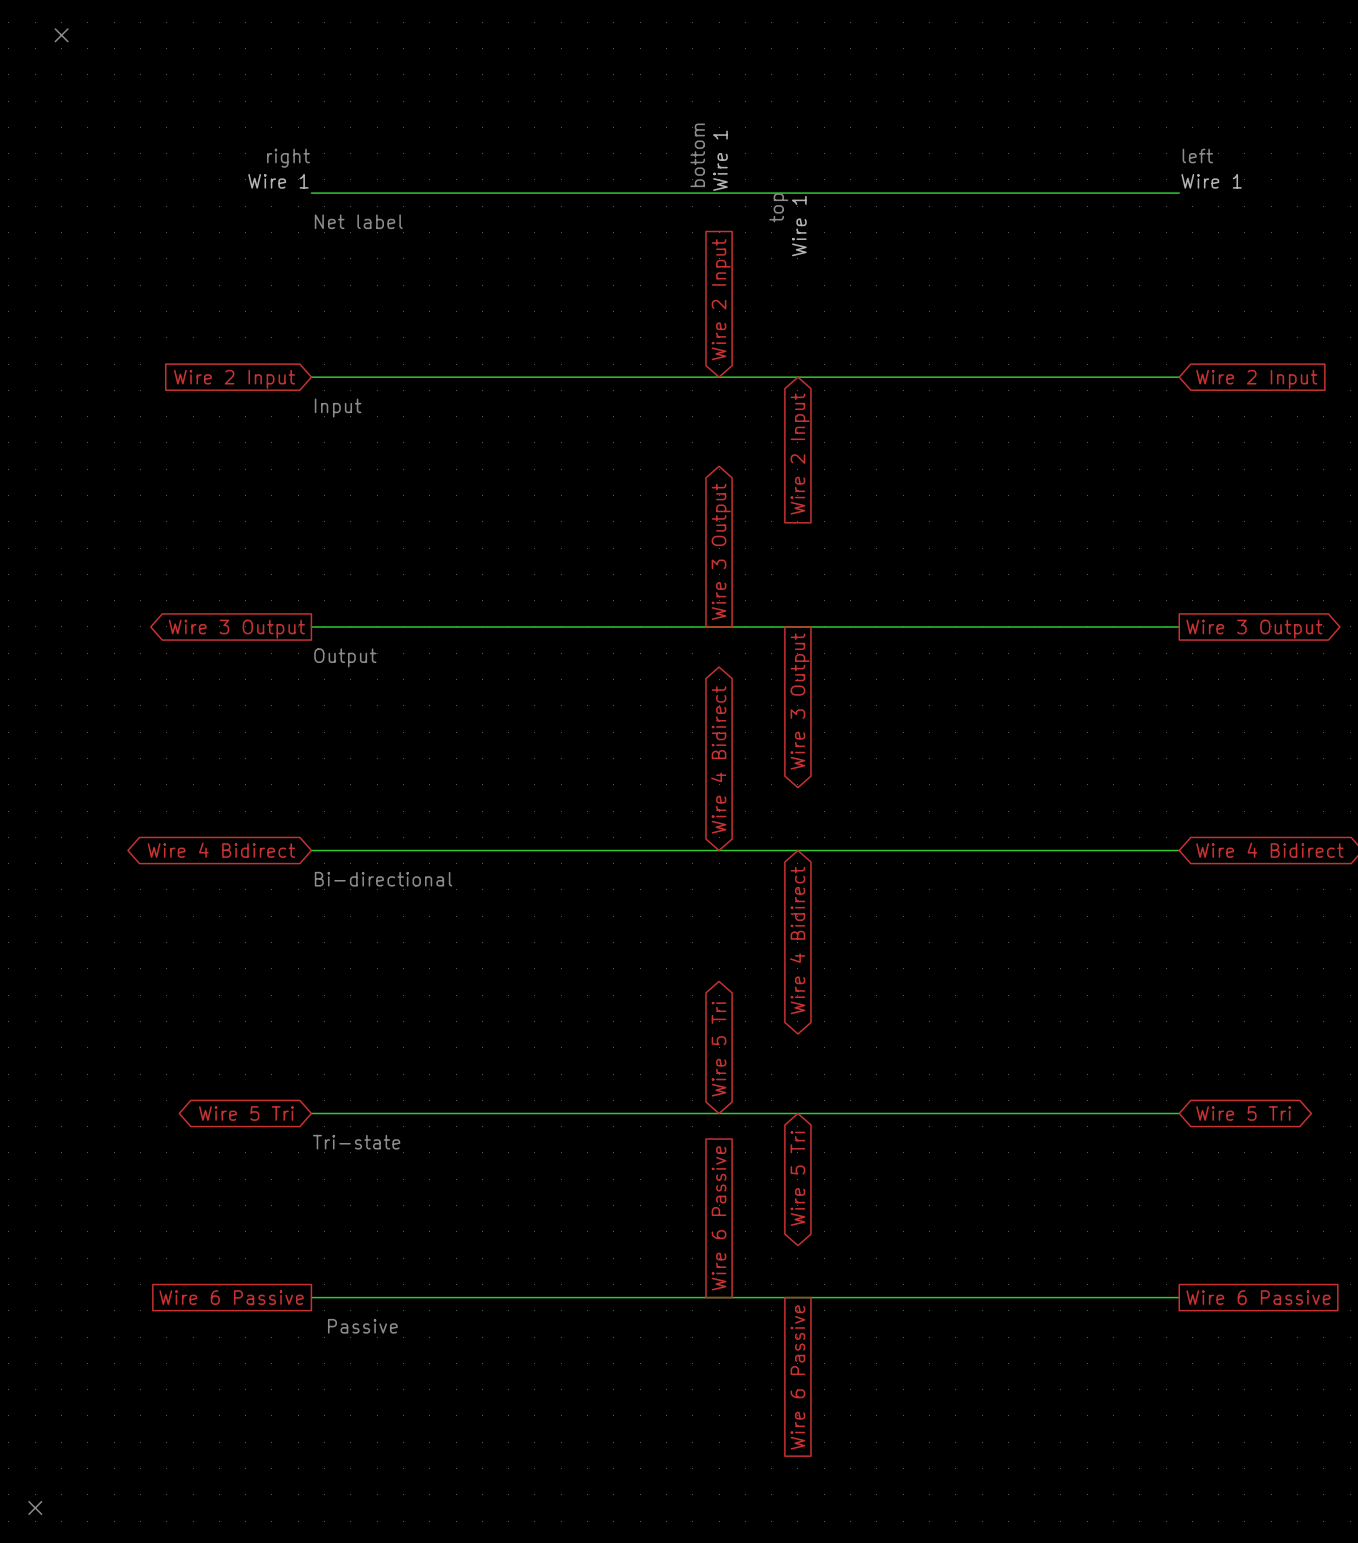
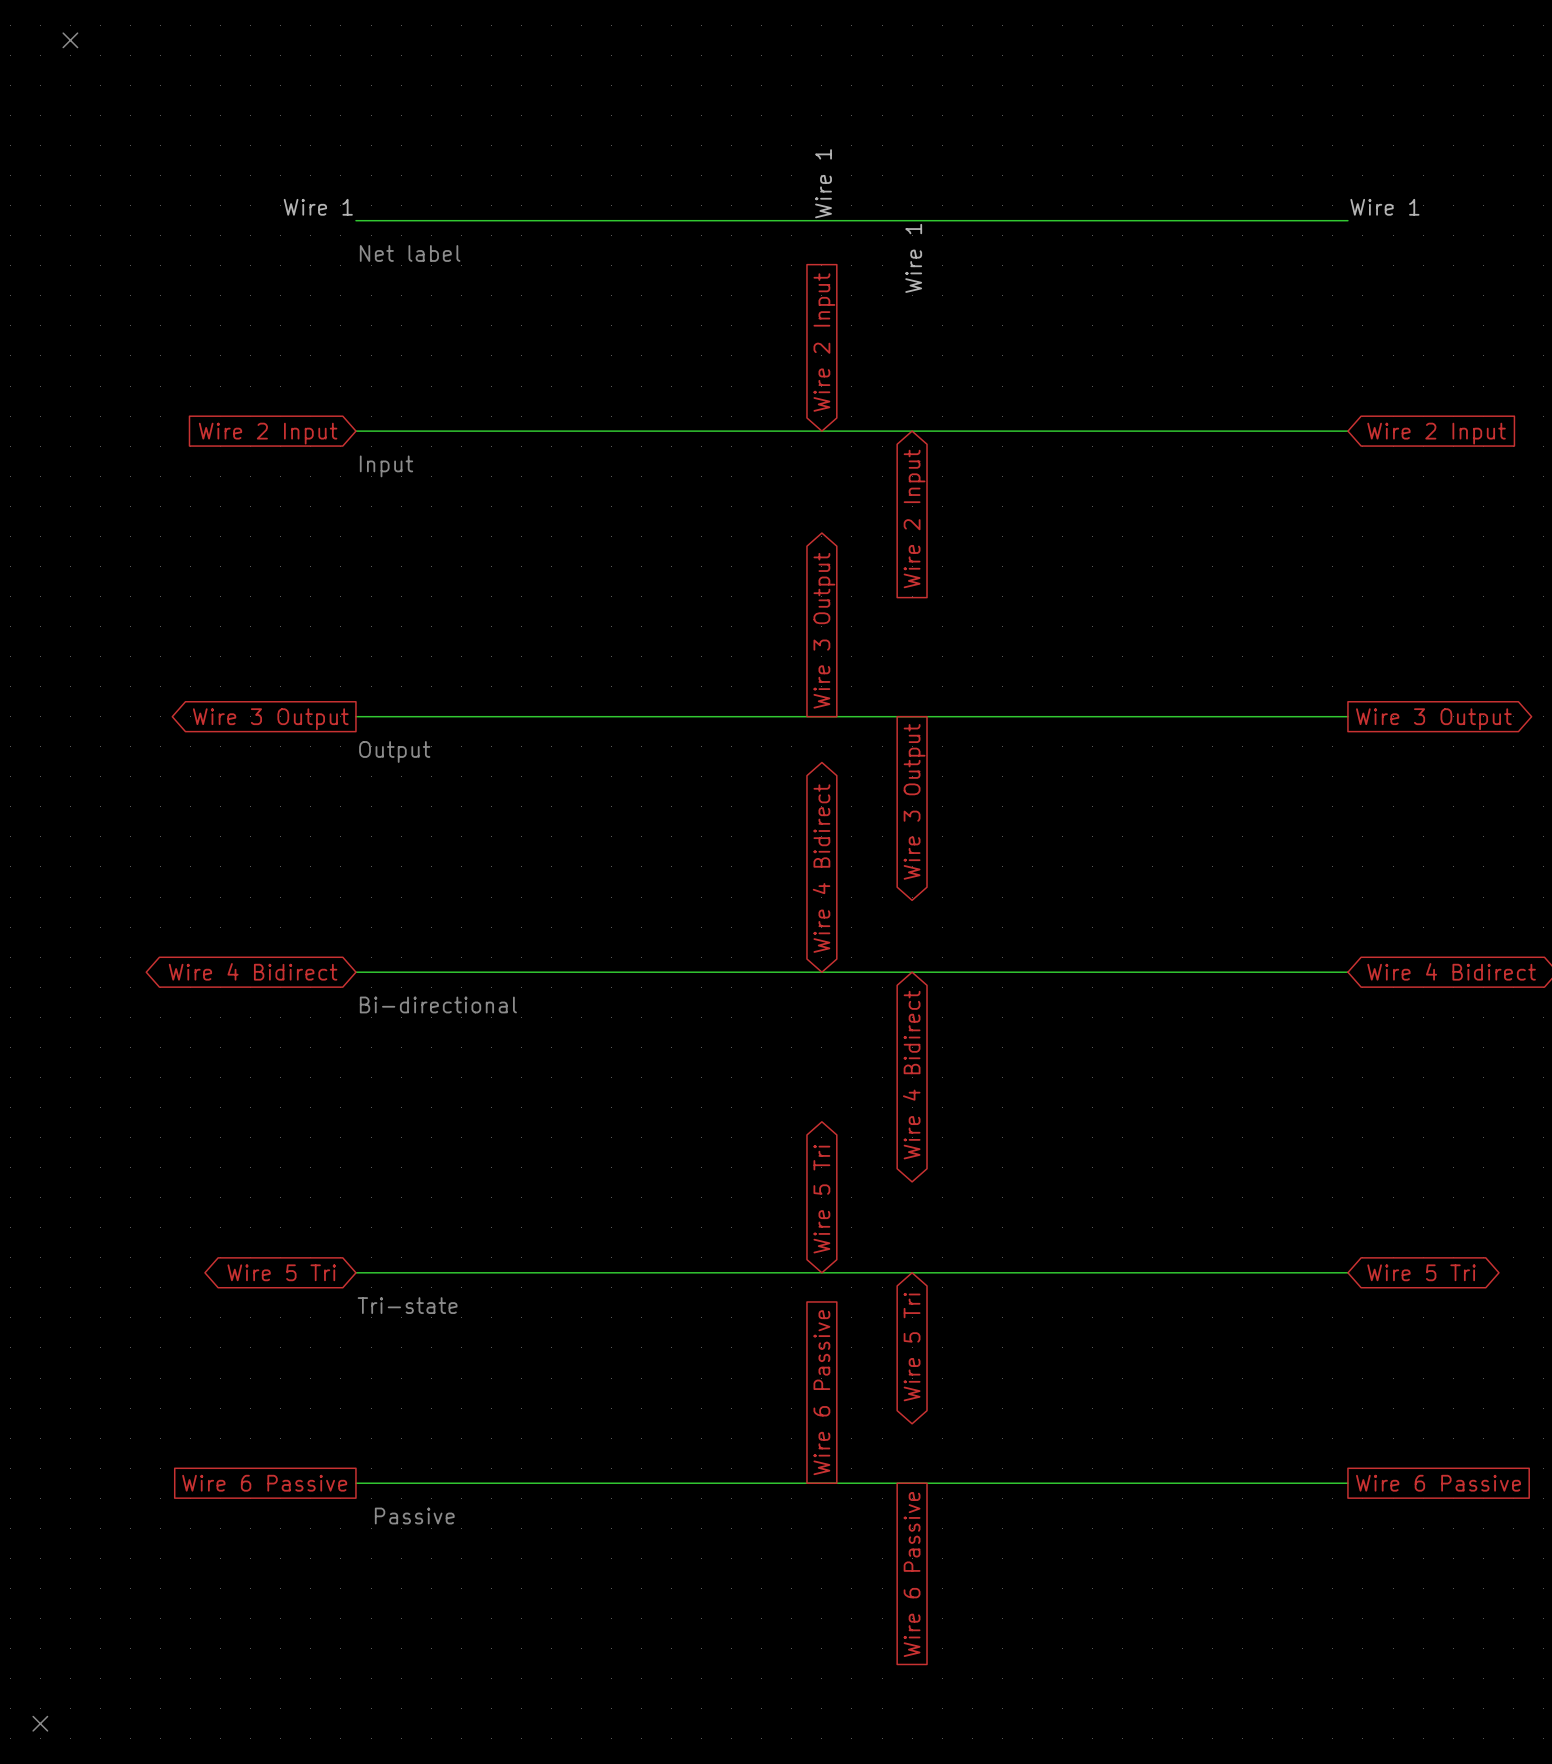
text: bottom (697, 155) -> none
text: left (1197, 156) -> none
text: right (288, 158) -> none
text: top (778, 207) -> none

